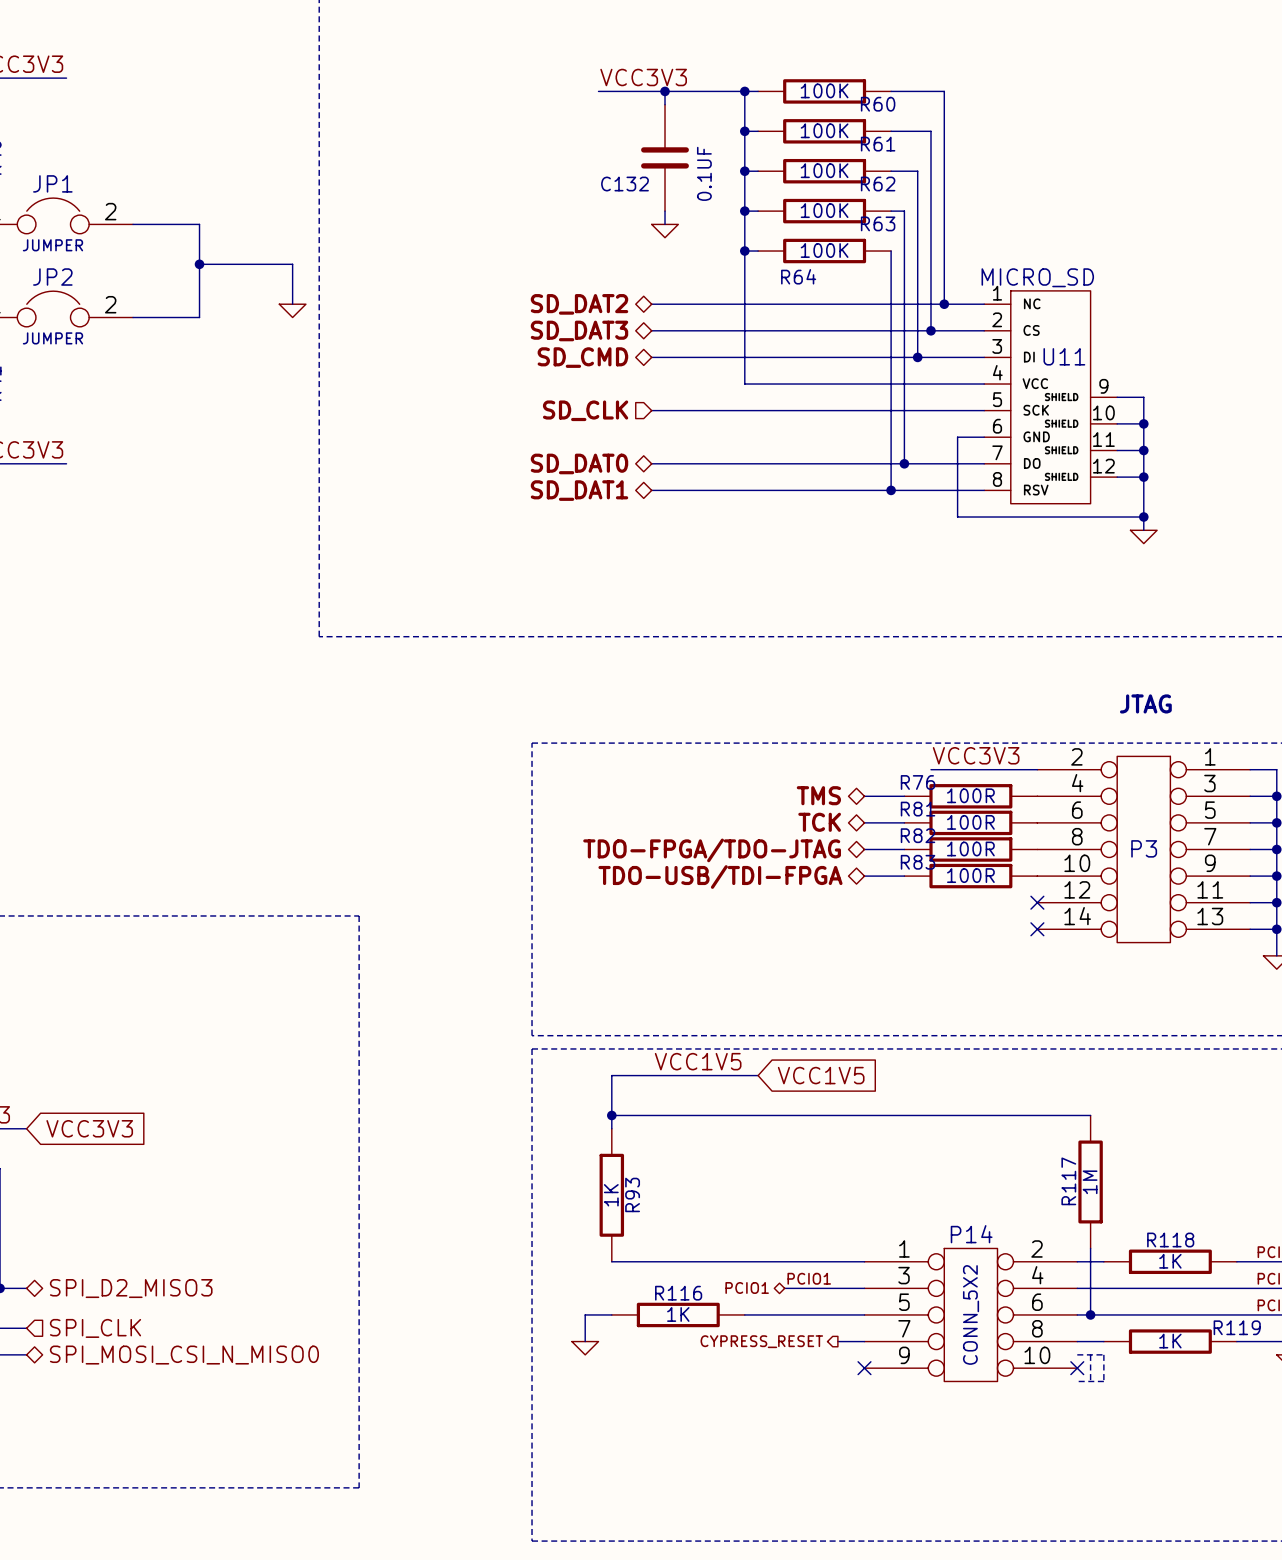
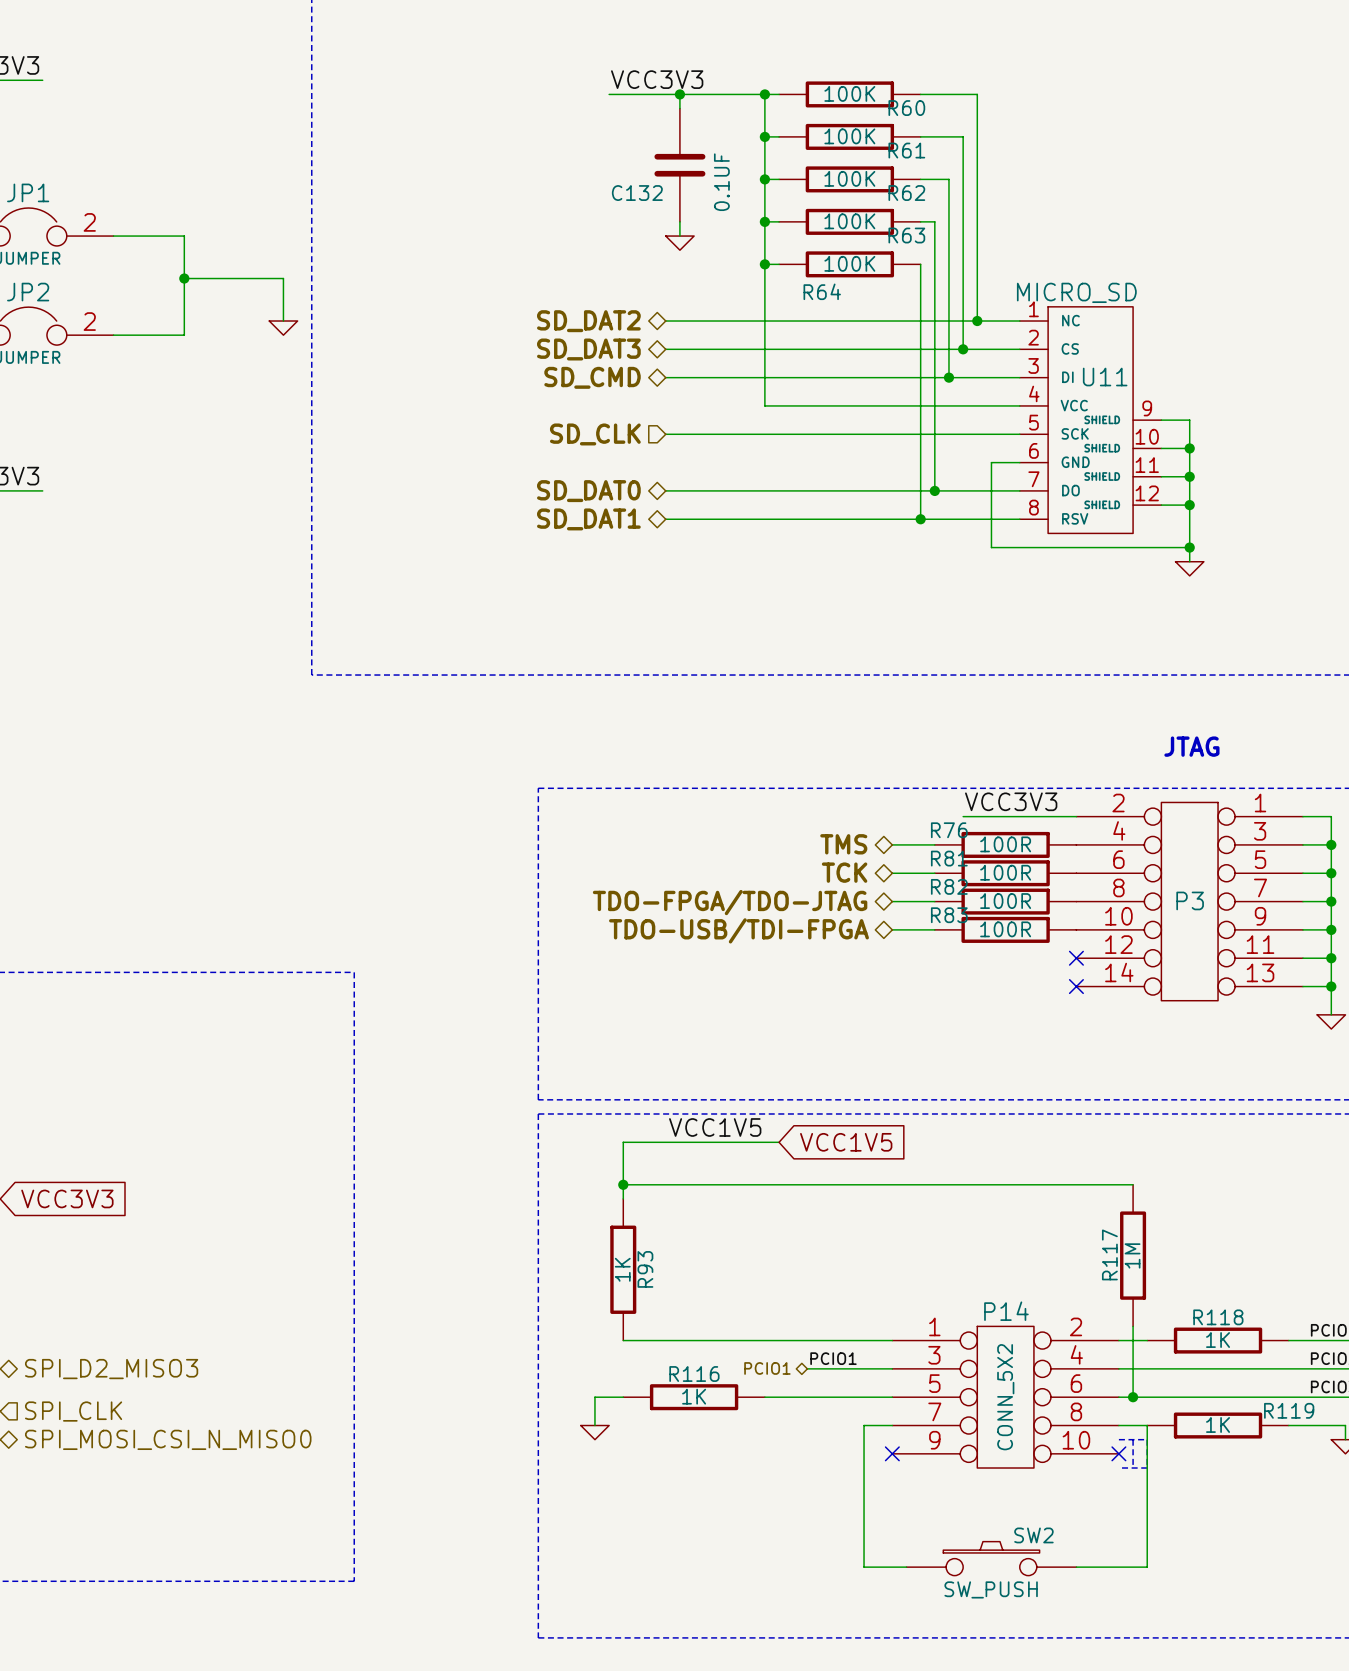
hierarchical label: CYPRESS_RESET (761, 1341) -> none
wire: none -> (864, 1425) (864, 1567) (906, 1567)
wire: none -> (1147, 1425) (1147, 1567) (1076, 1567)
SW2: none -> SW_PUSH (991, 1558)

